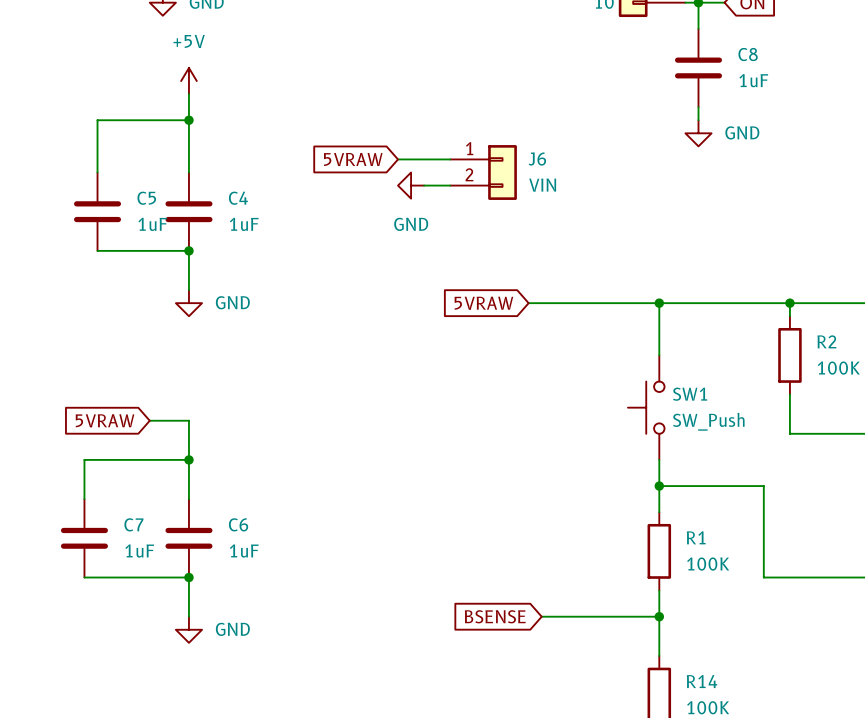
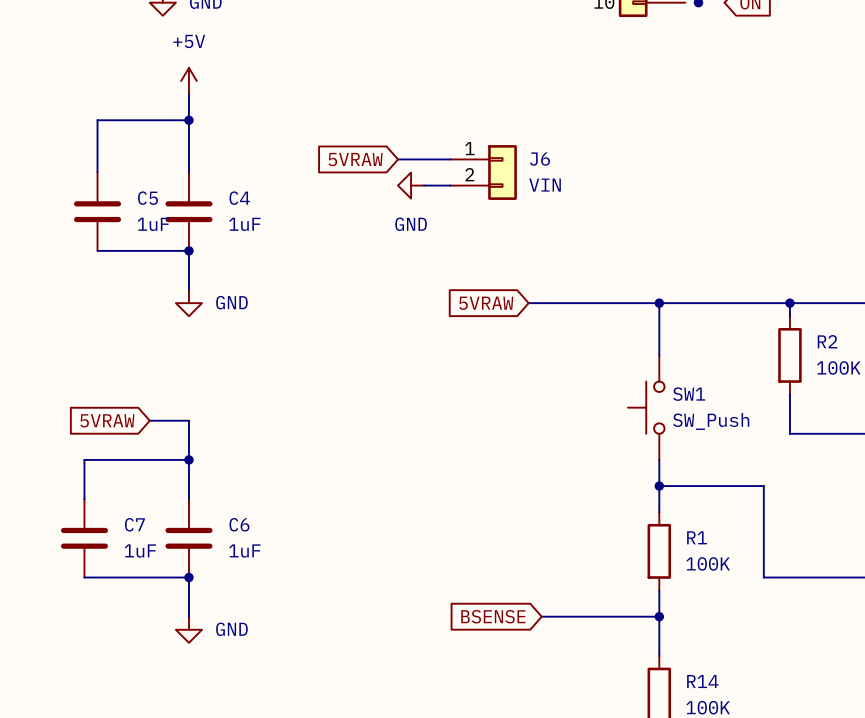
wire: (685, 2) (724, 2) -> none
wire: (698, 2) (698, 28) -> none
C8: 1uF (698, 67) -> none
wire: (698, 107) (698, 120) -> none
power symbol: GND (698, 133) -> none

